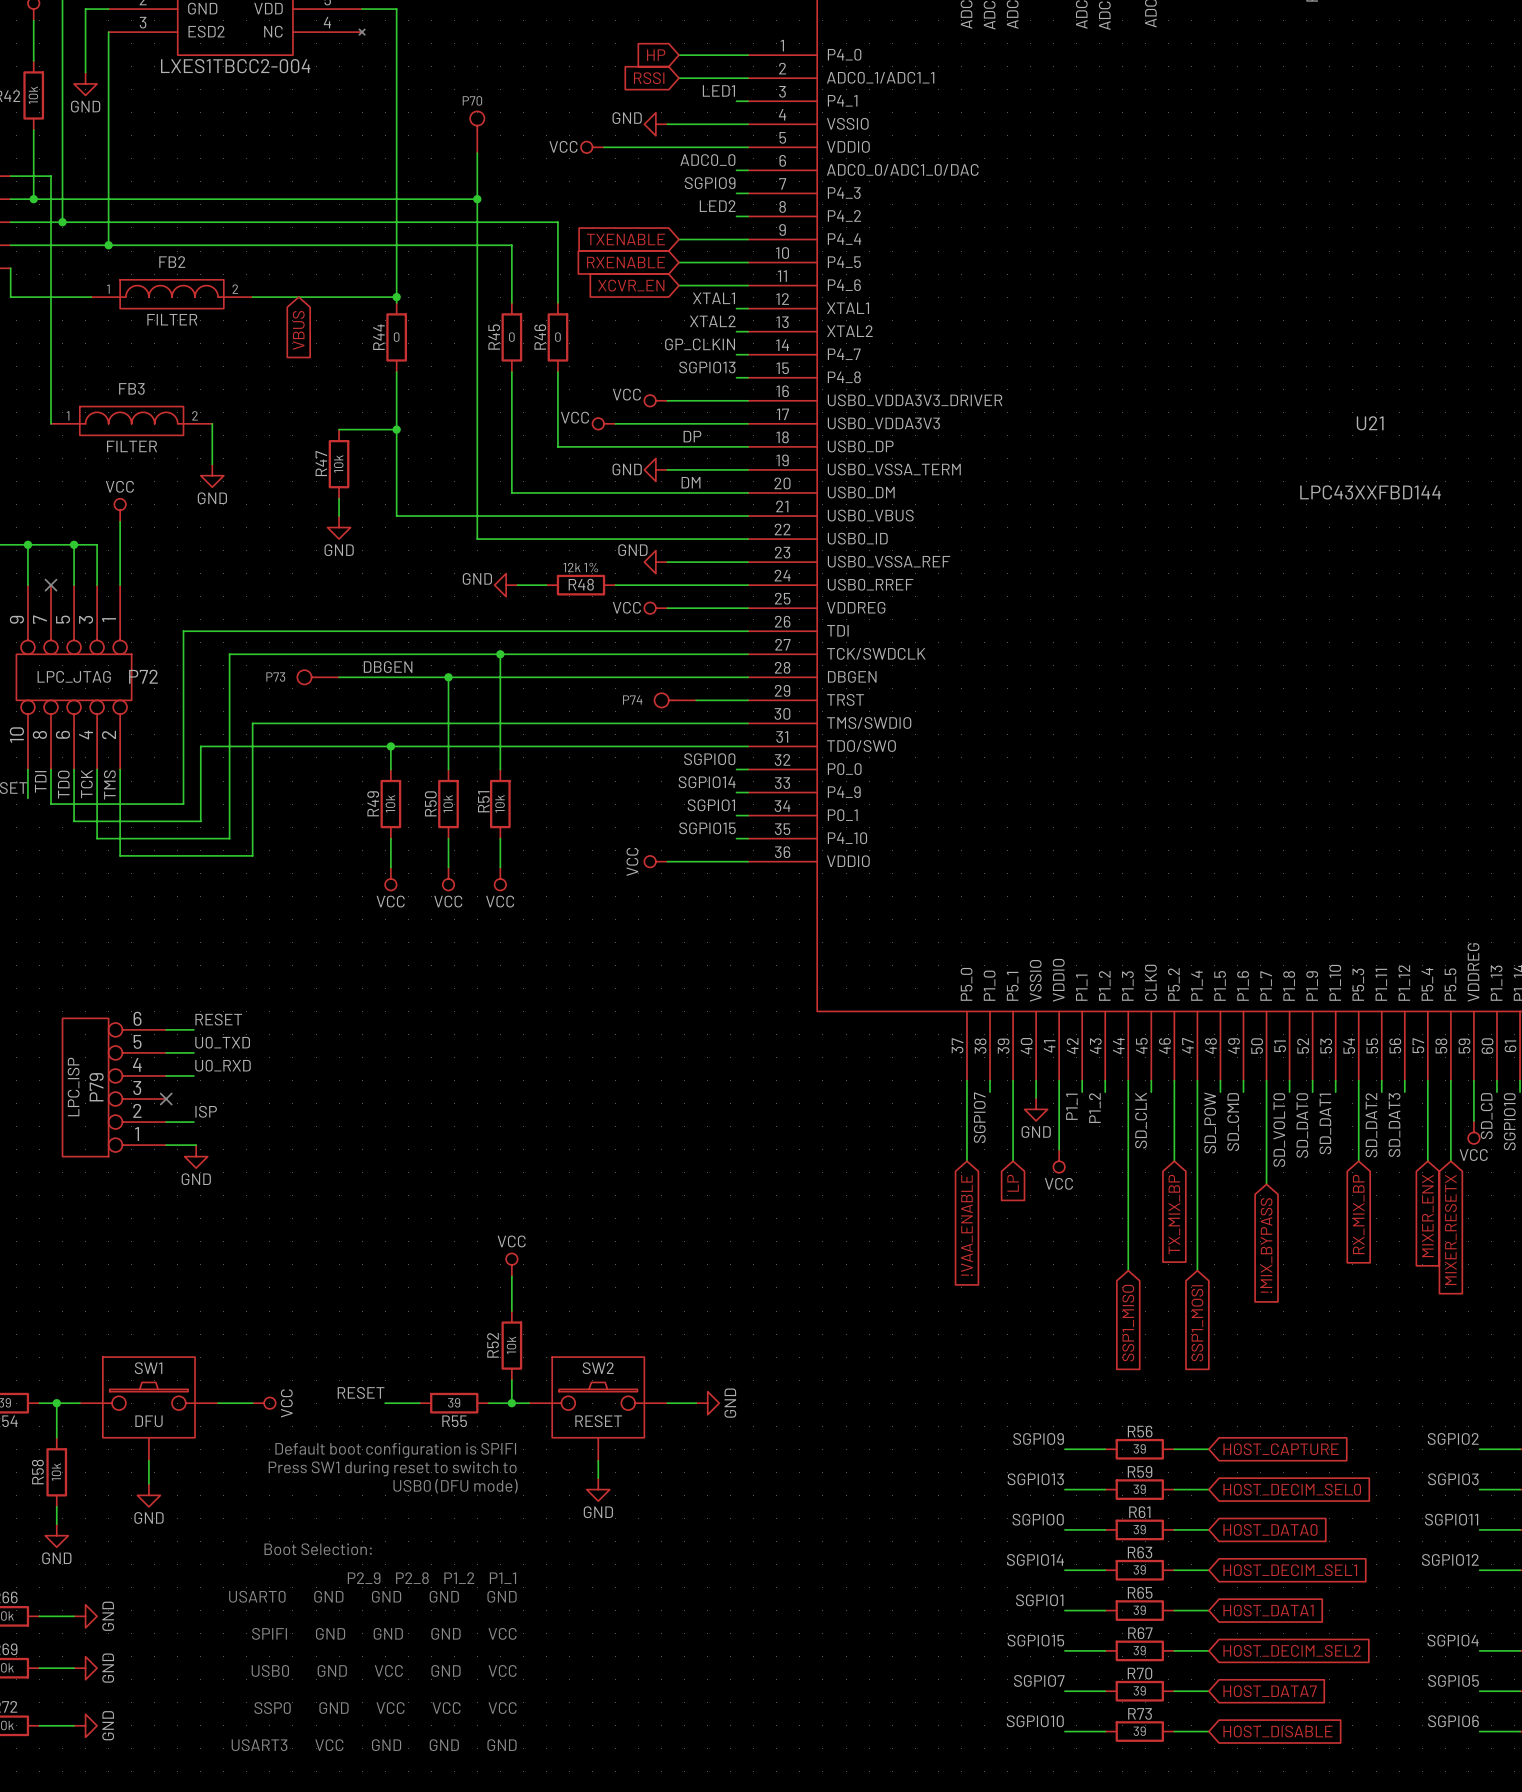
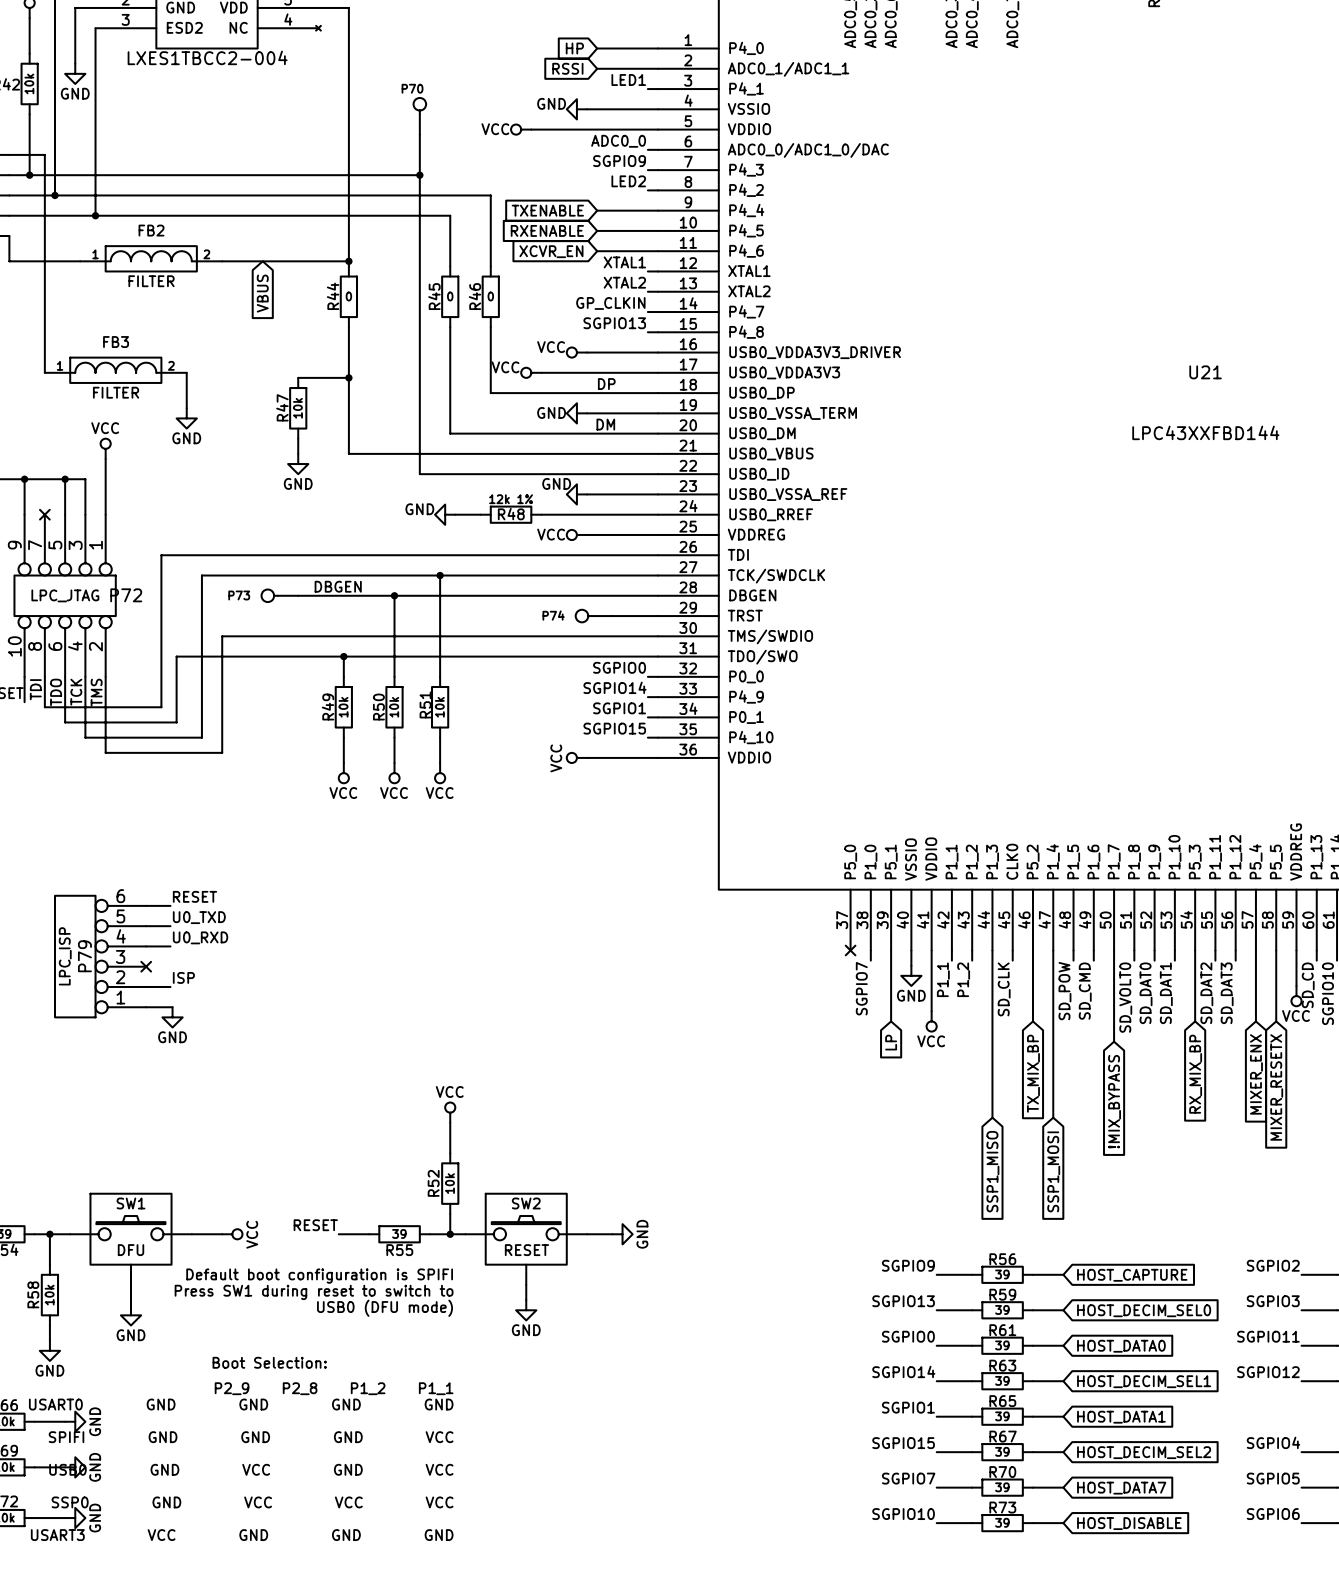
wire: (966, 1080) (966, 1161) -> none
no-connect mark: none -> (850, 950)
global label: !VAA_ENABLE (966, 1225) -> none

